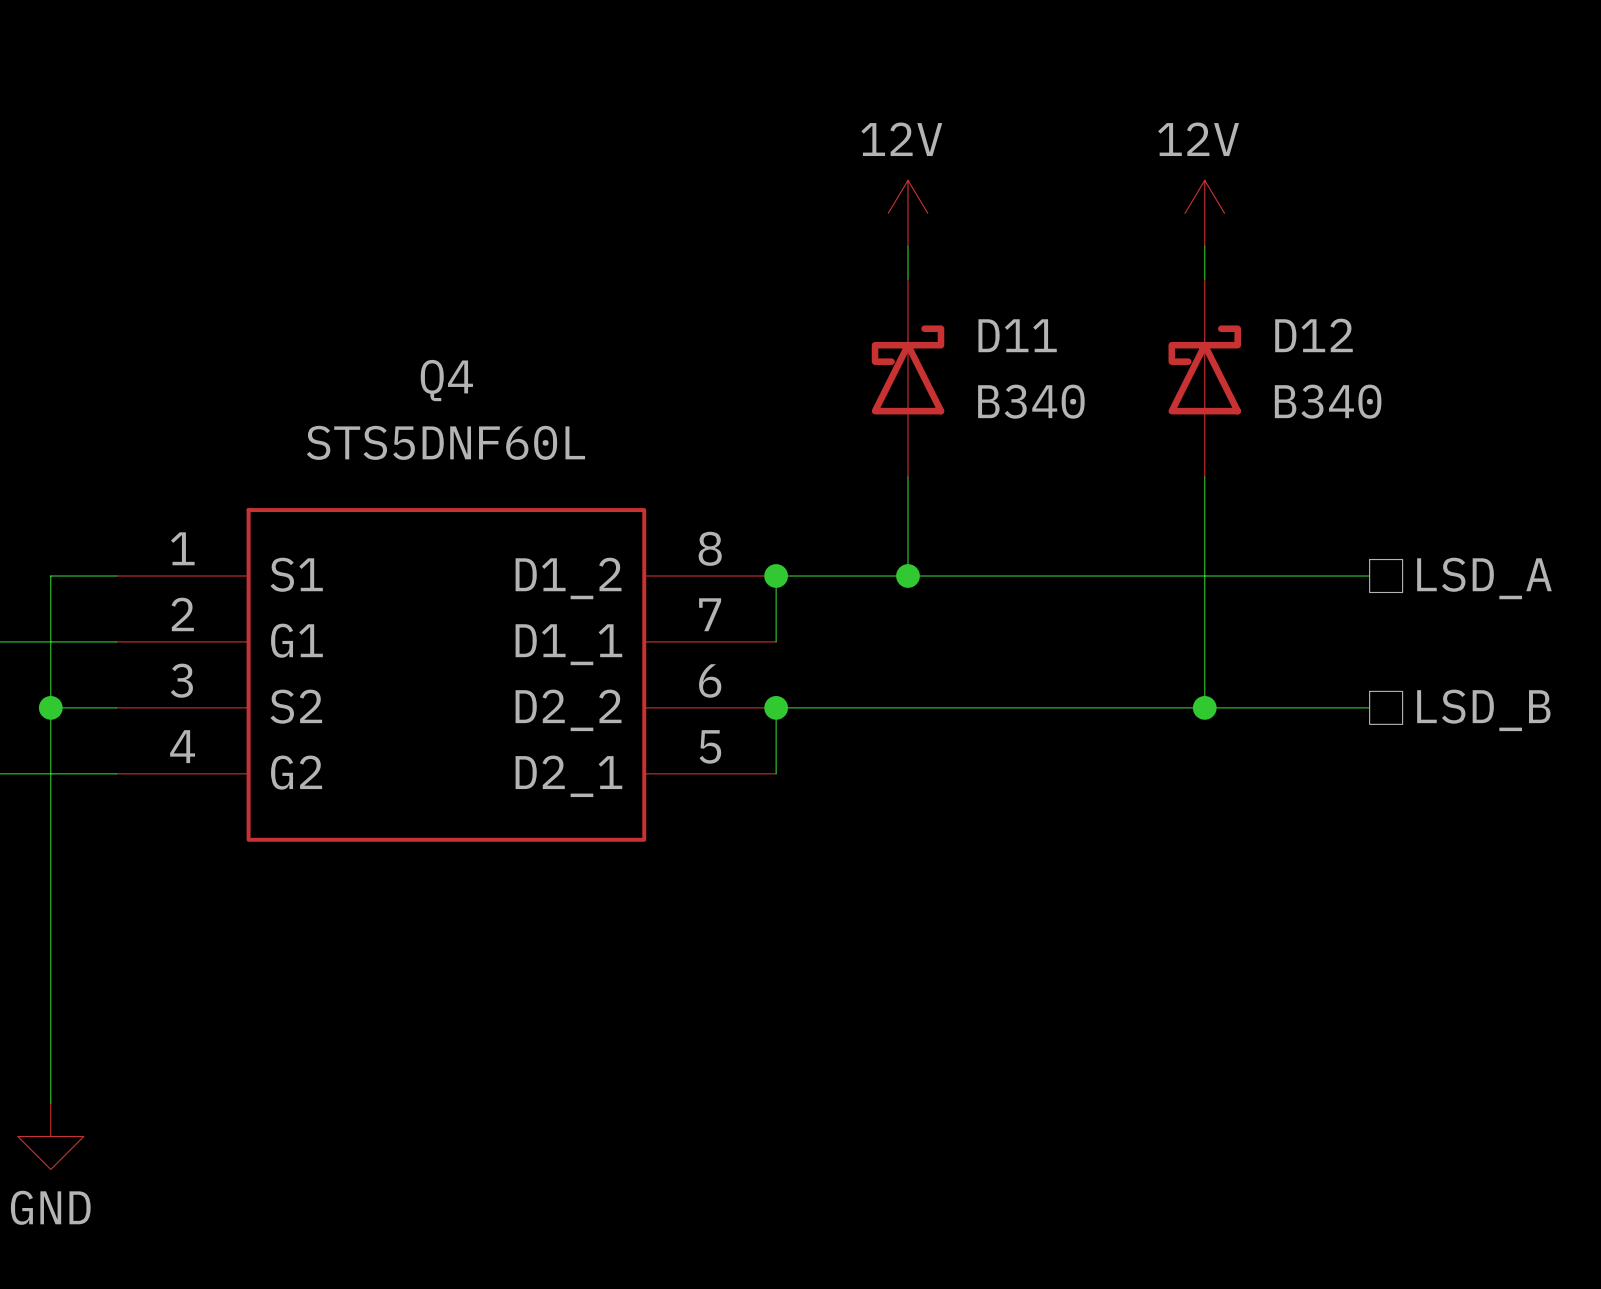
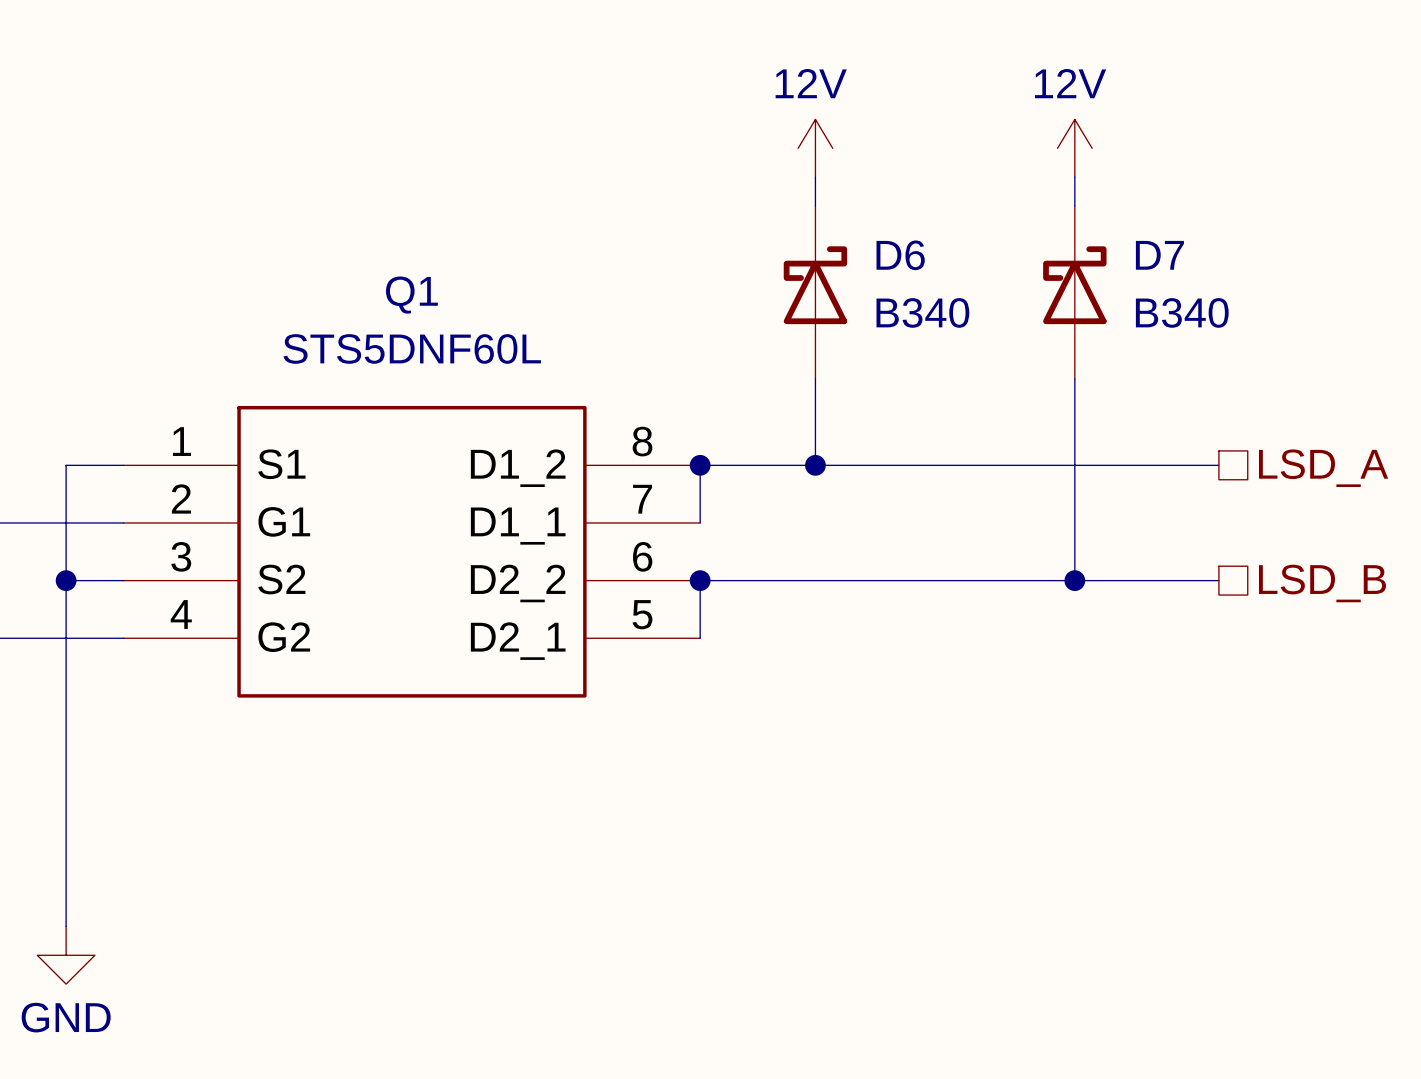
D11 name: D11 (1017, 335) -> D6 (900, 255)
D12 name: D12 (1313, 335) -> D7 (1159, 255)
Q4 name: Q4 (446, 380) -> Q1 (411, 295)

